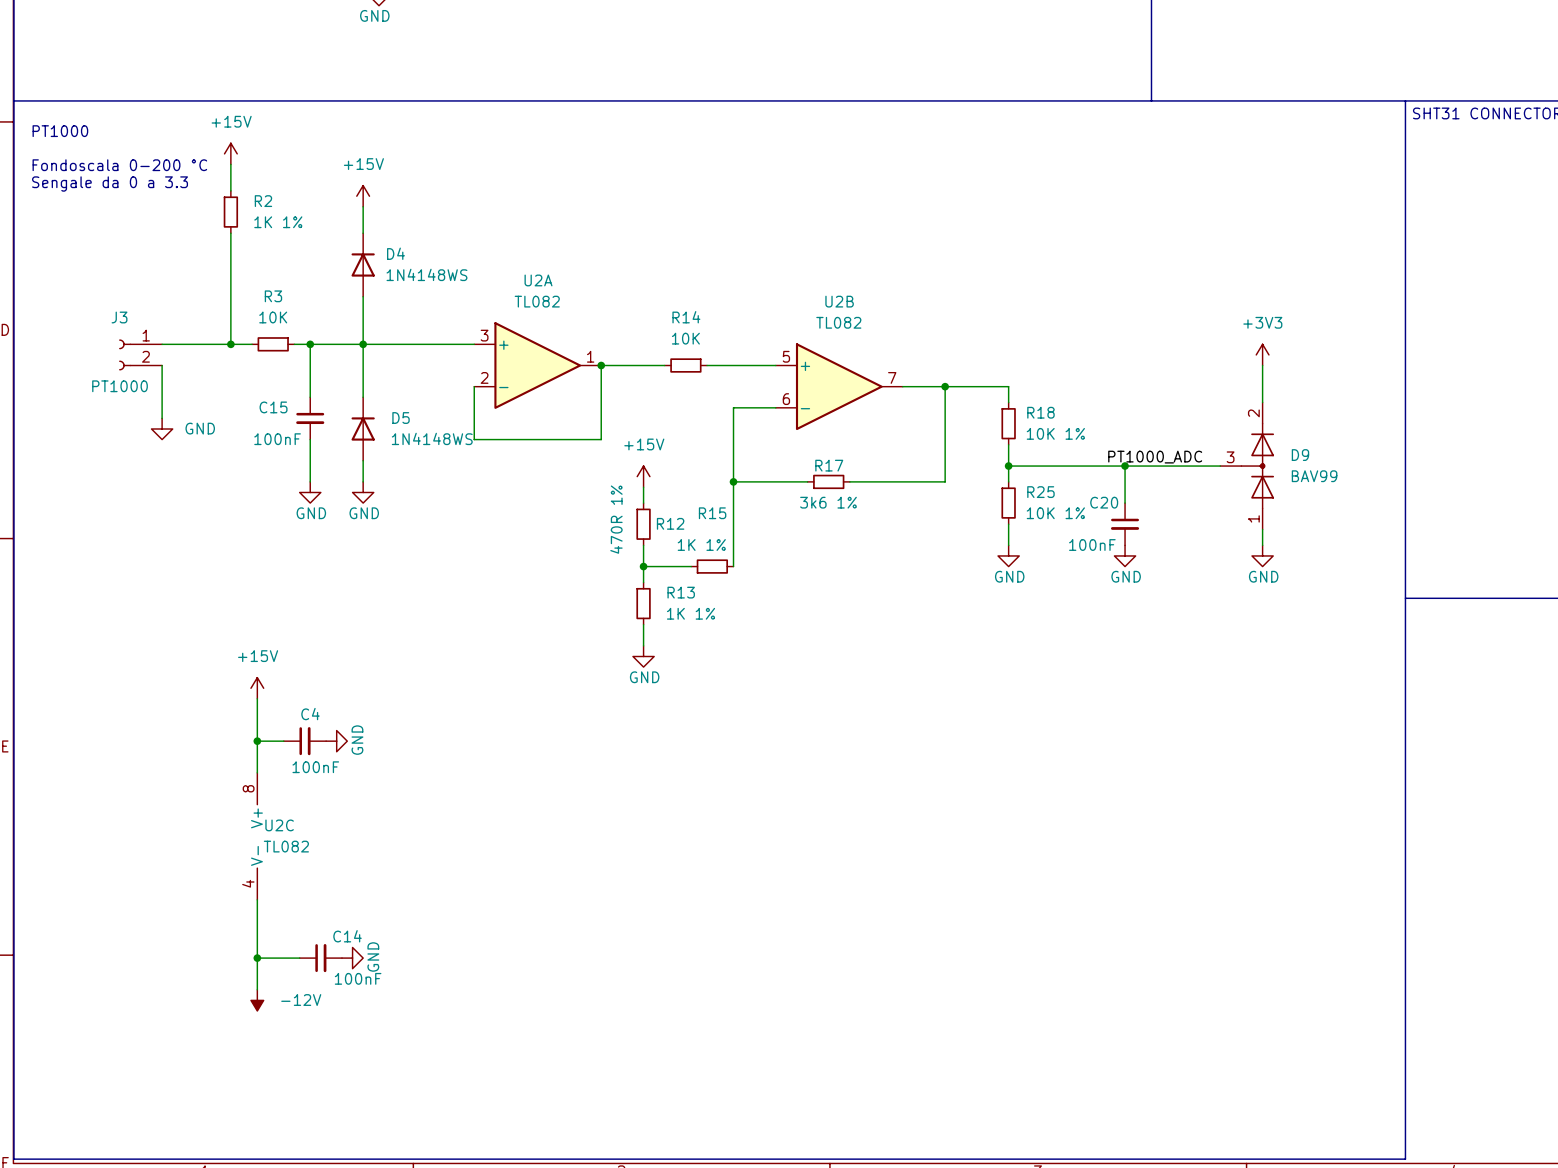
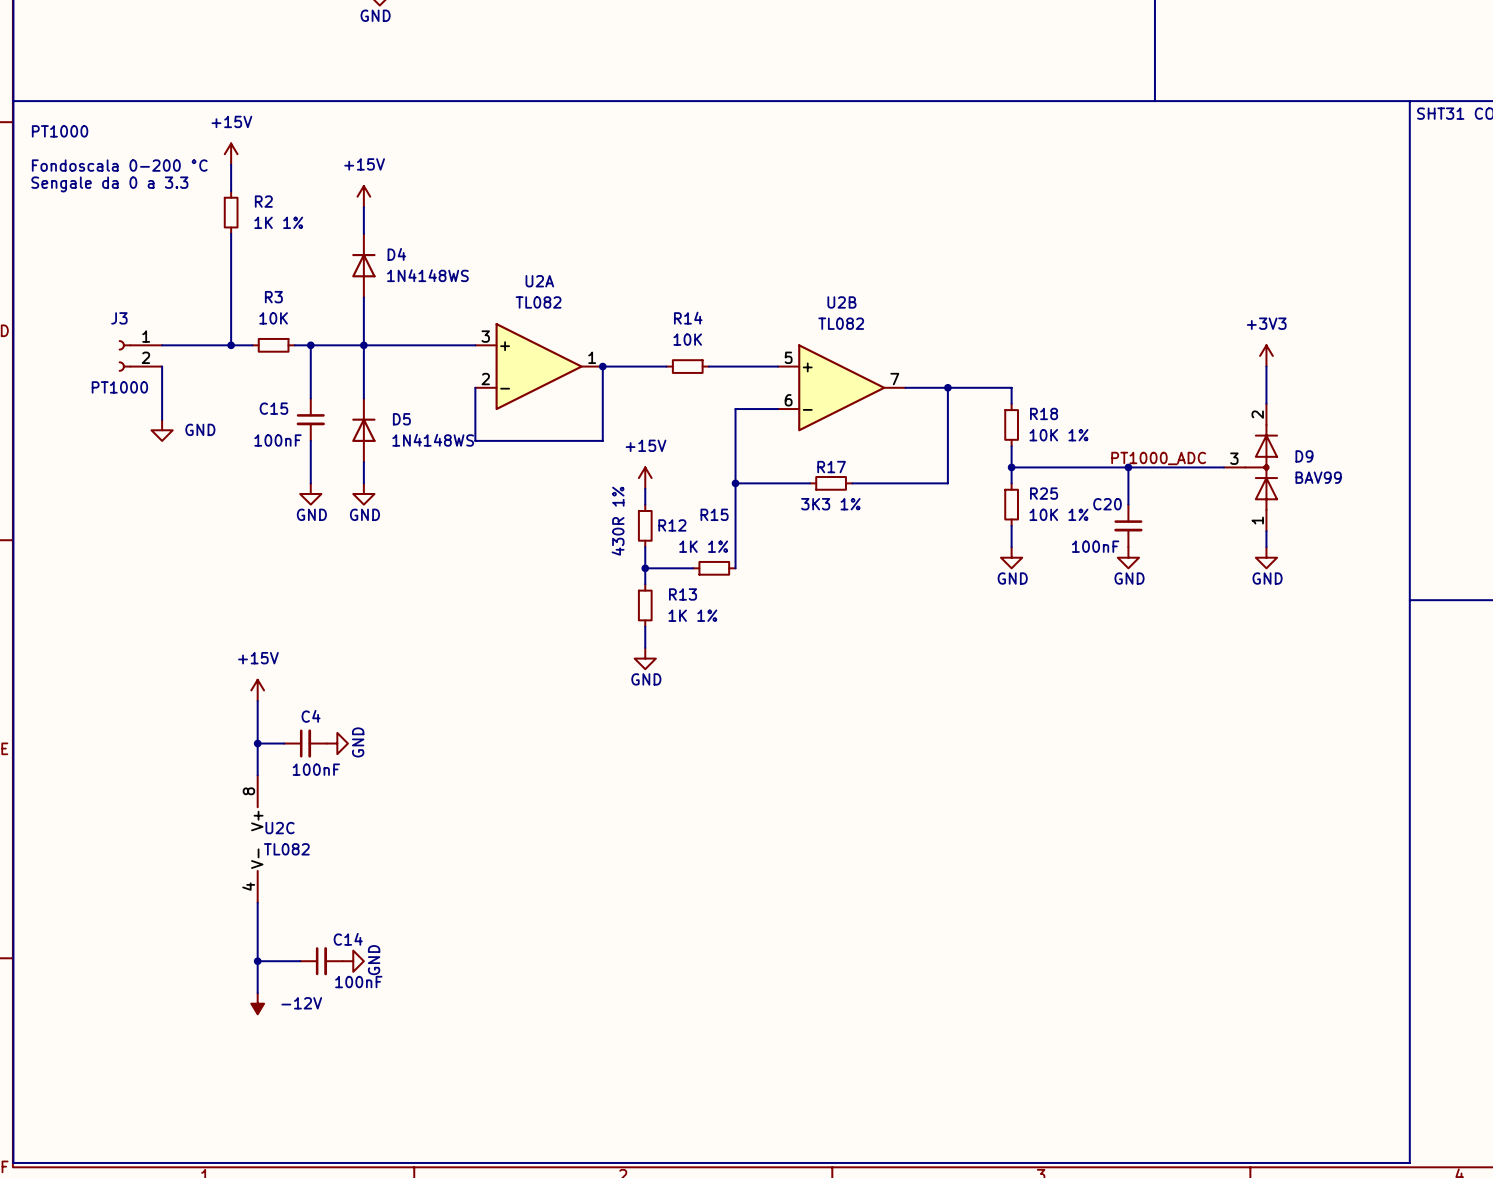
R17 value: 3k6 1% (828, 502) -> 3K3 1% (830, 504)
R12 value: 470R 1% (616, 519) -> 430R 1% (618, 521)

